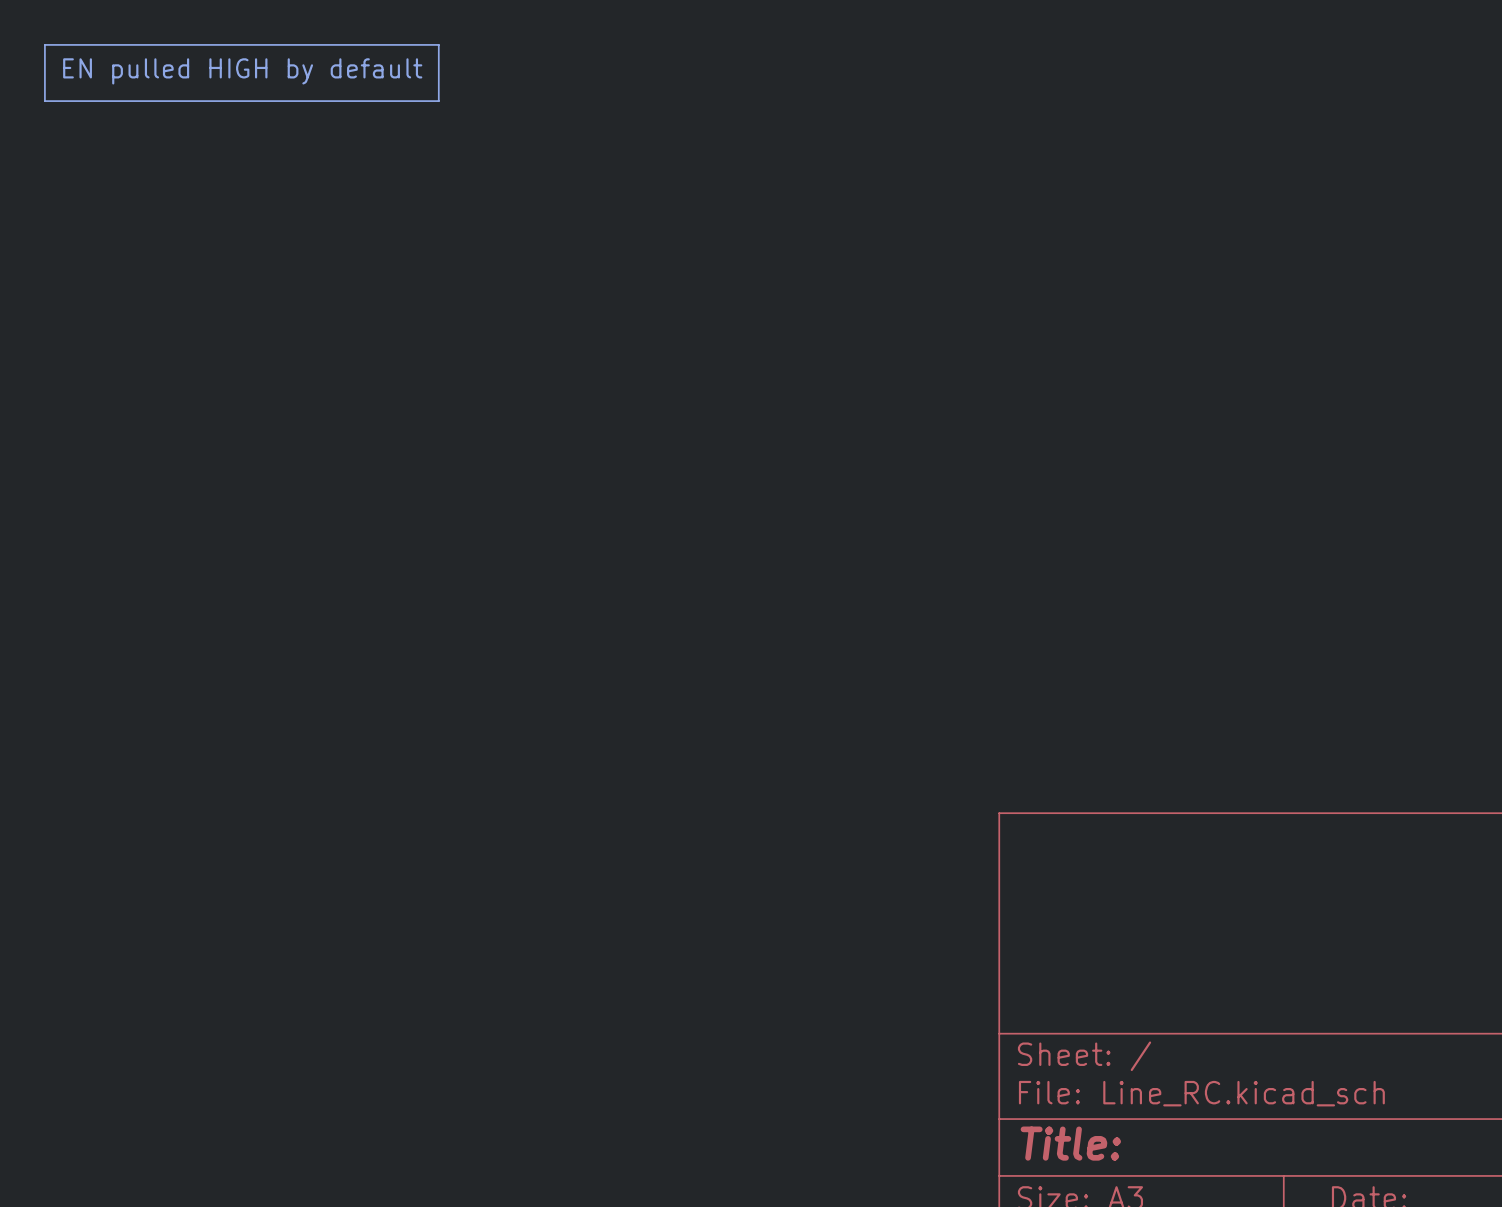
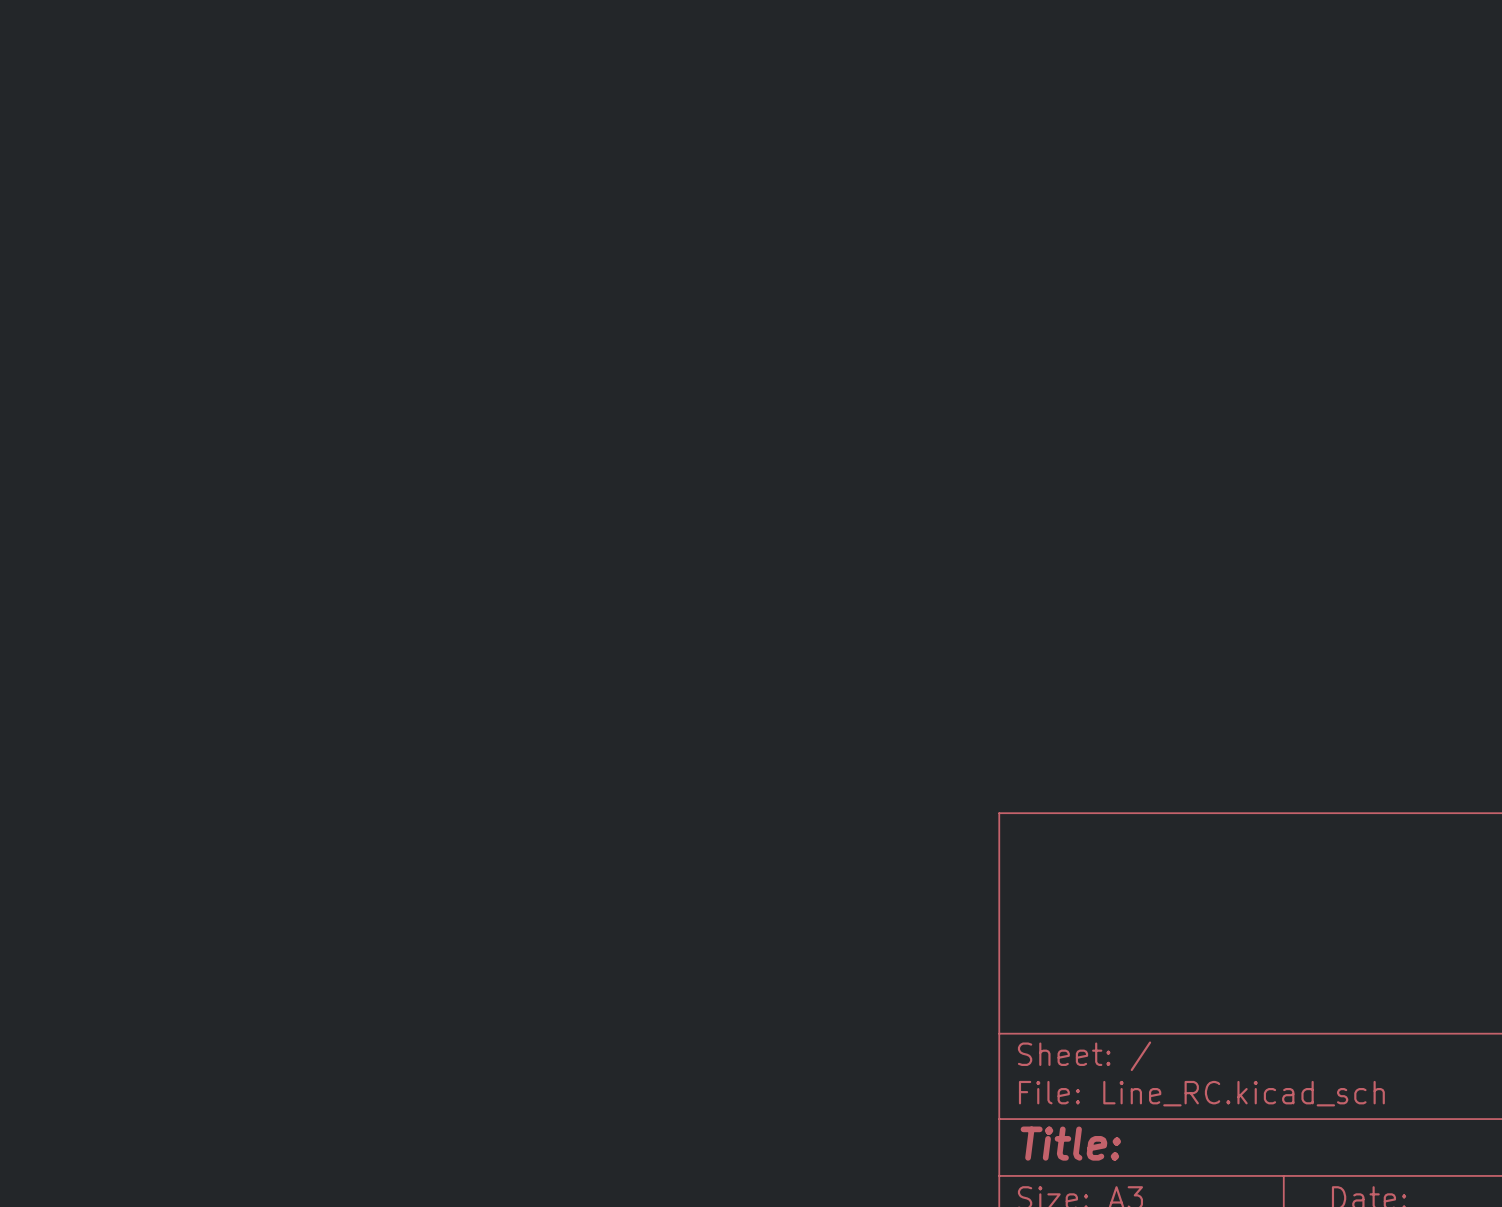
line: (44, 44) (438, 44) (438, 101) (44, 101) (44, 44) -> none
text: EN pulled HIGH by default (242, 71) -> none

